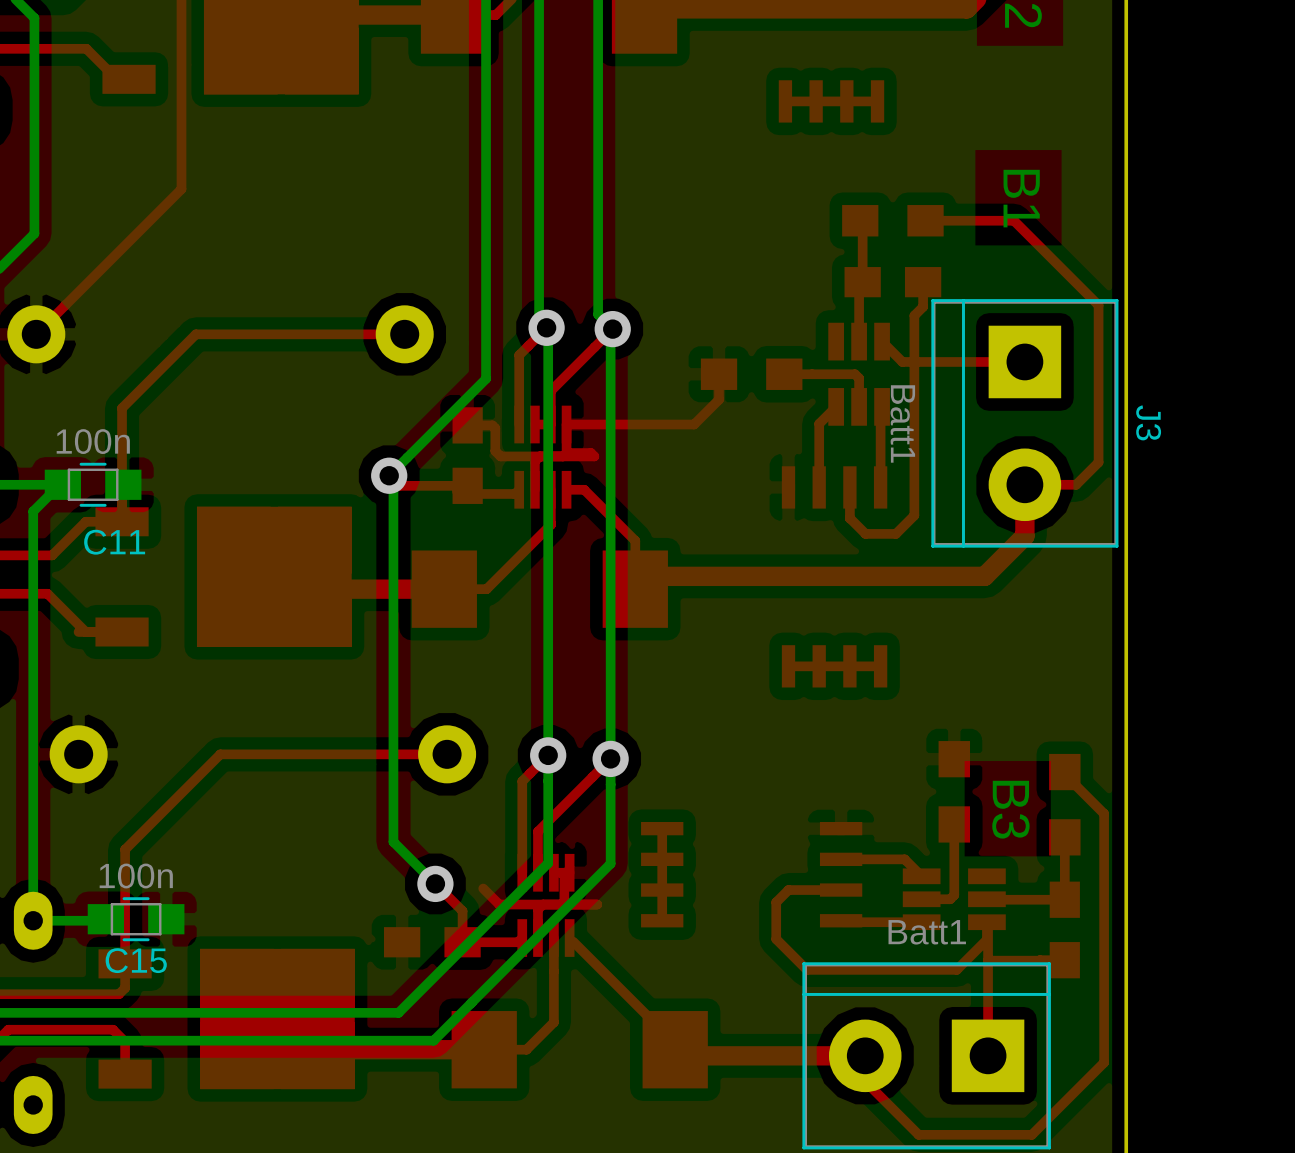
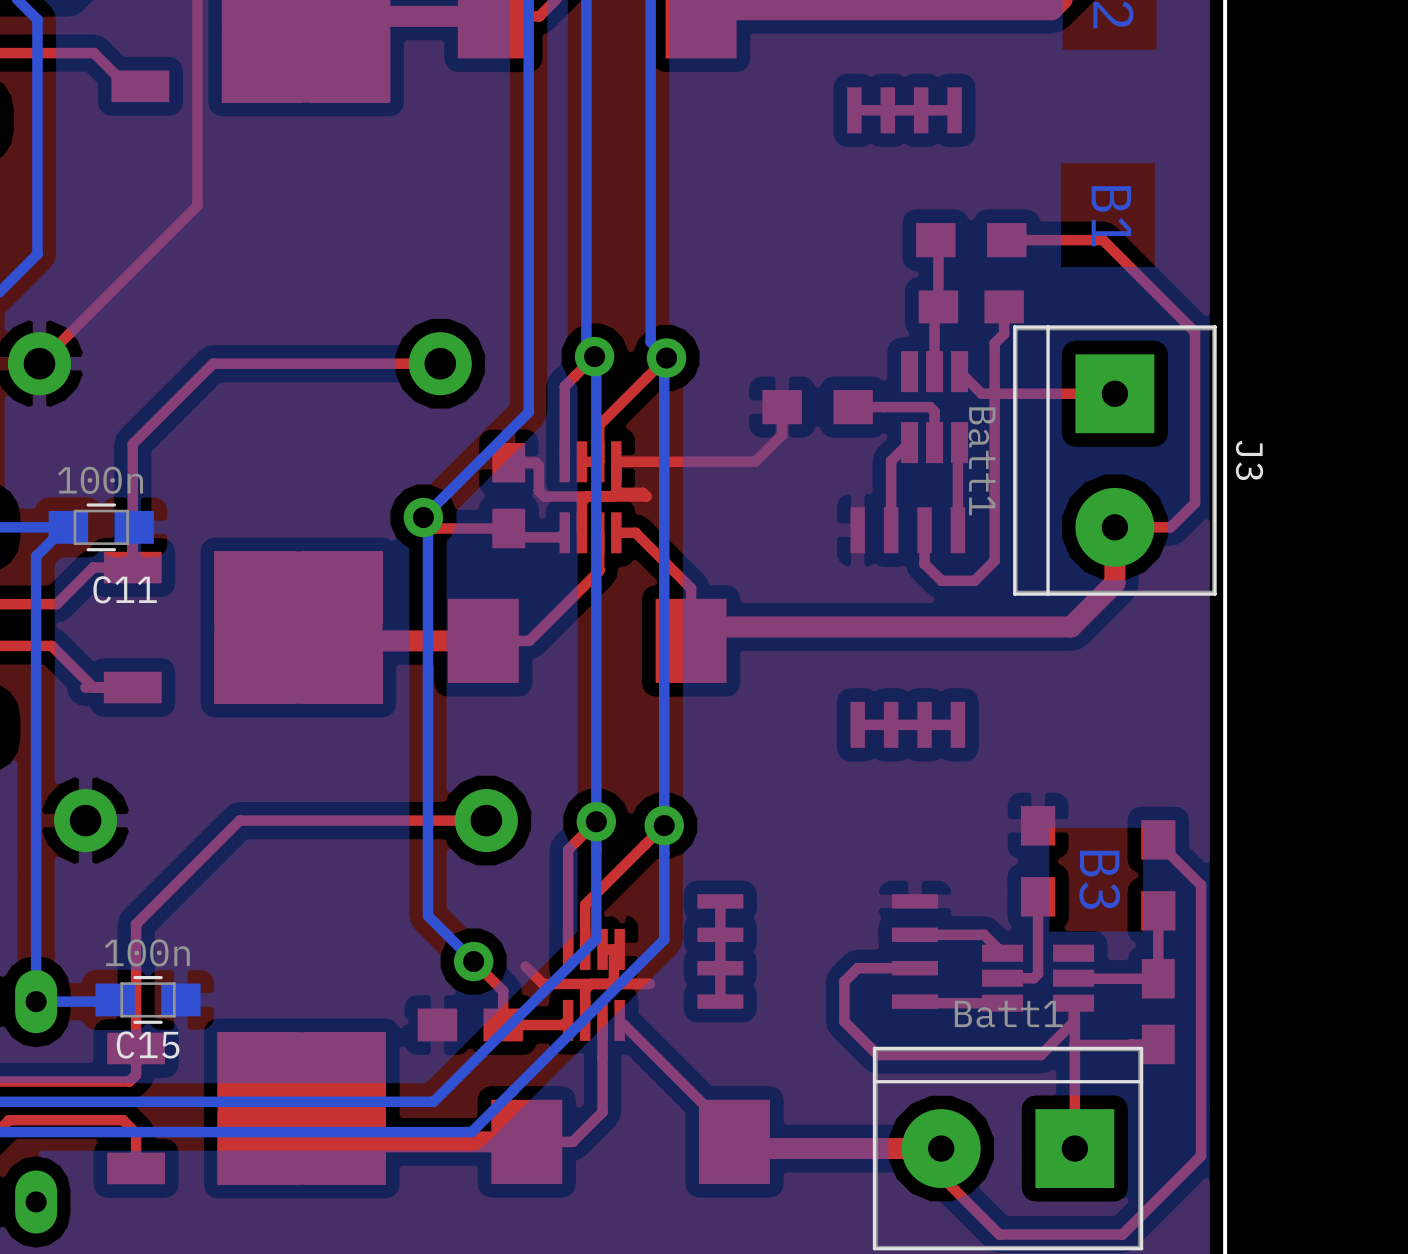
J3 footprint: [931, 299, 1119, 548] -> [1013, 325, 1217, 596]
part footprint: [802, 962, 1051, 1150] -> [872, 1046, 1144, 1251]

